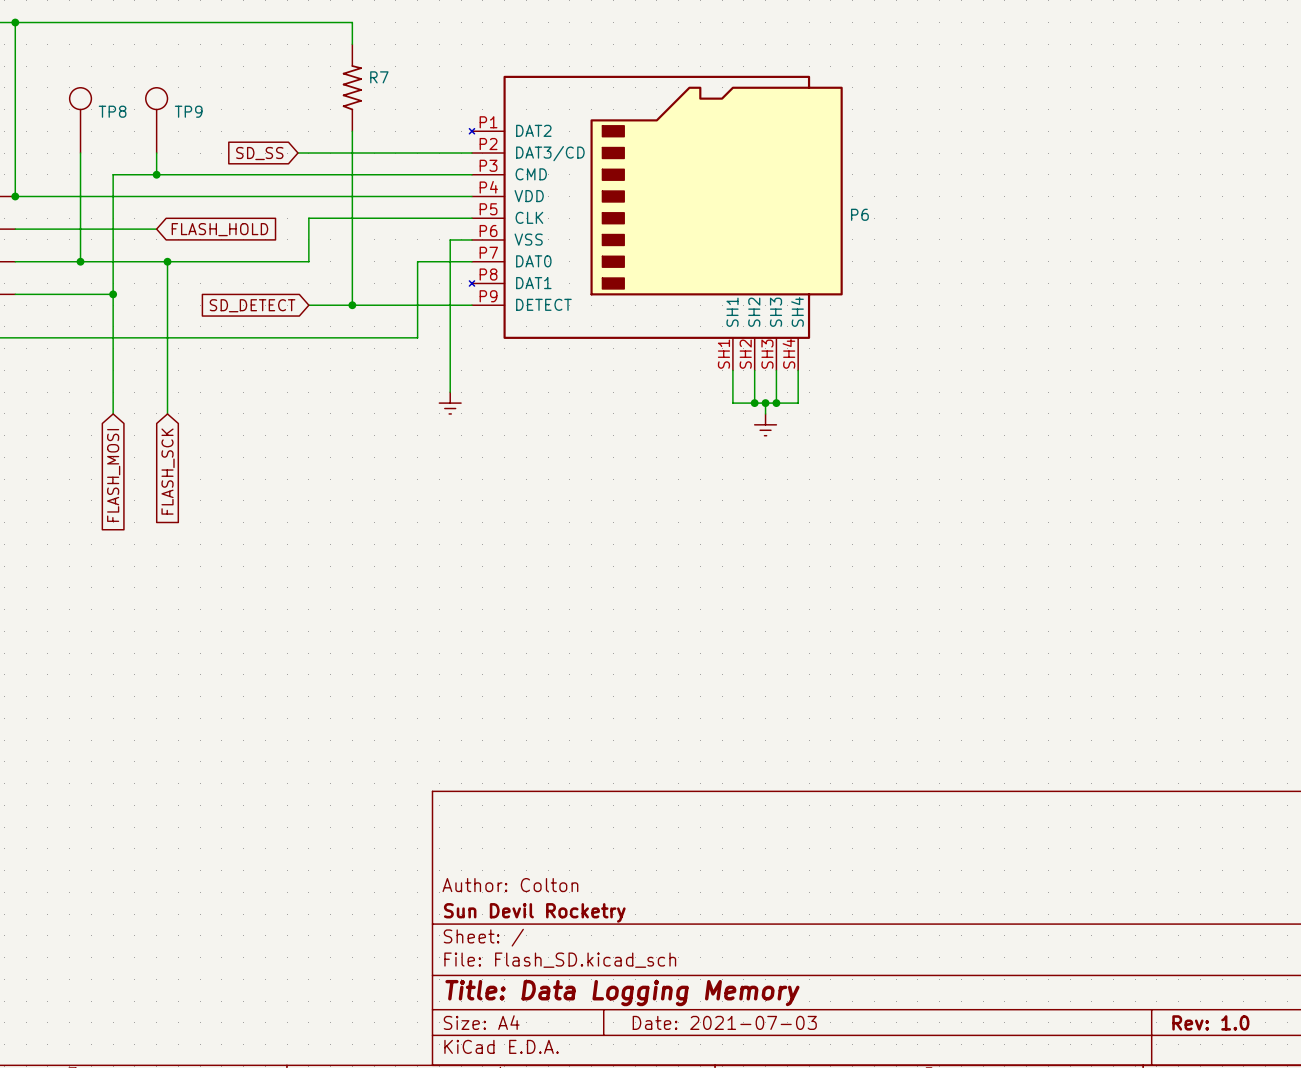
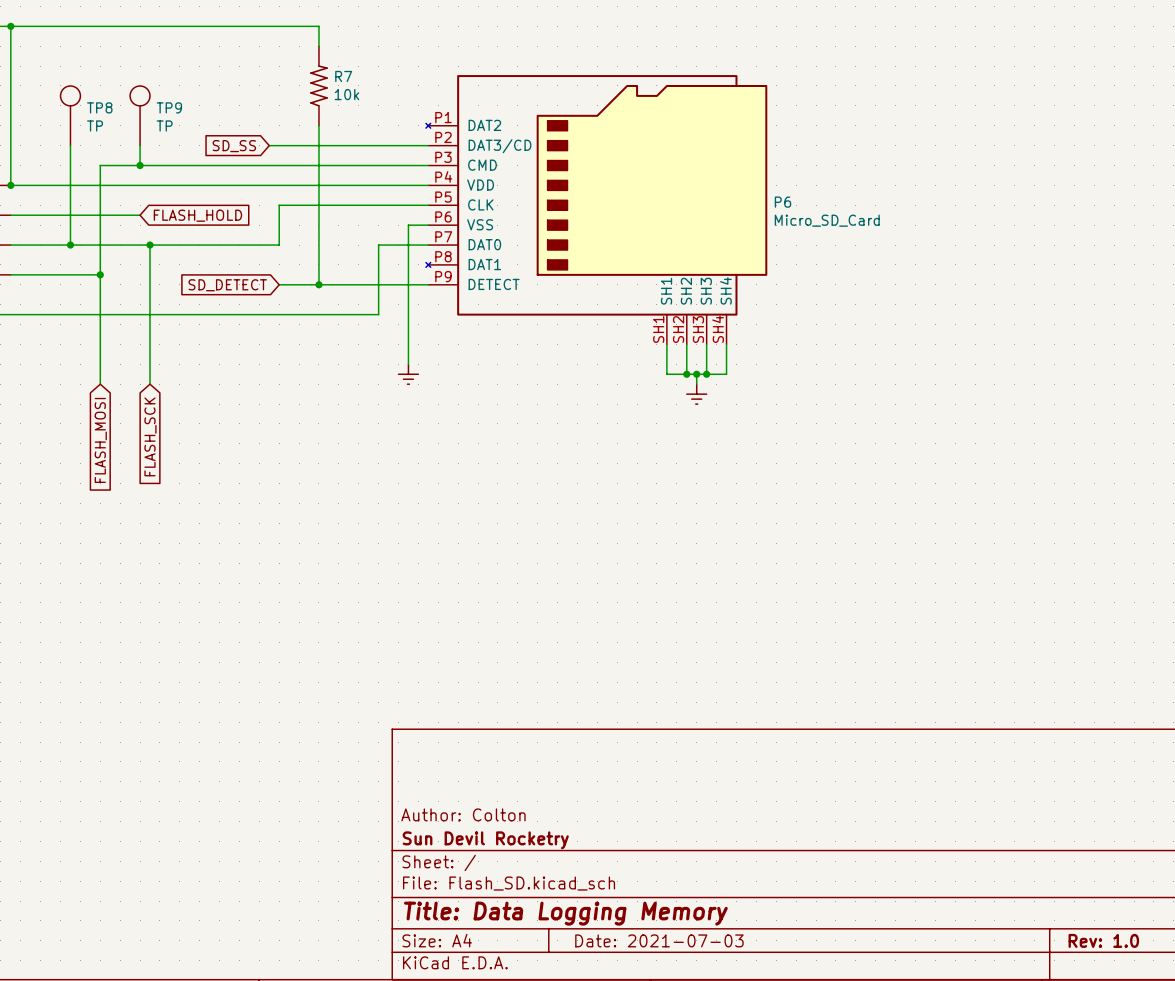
R7 value: none -> 10k (346, 94)
TP8 value: none -> TP (95, 125)
TP9 value: none -> TP (164, 125)
P6 value: none -> Micro_SD_Card (827, 220)

